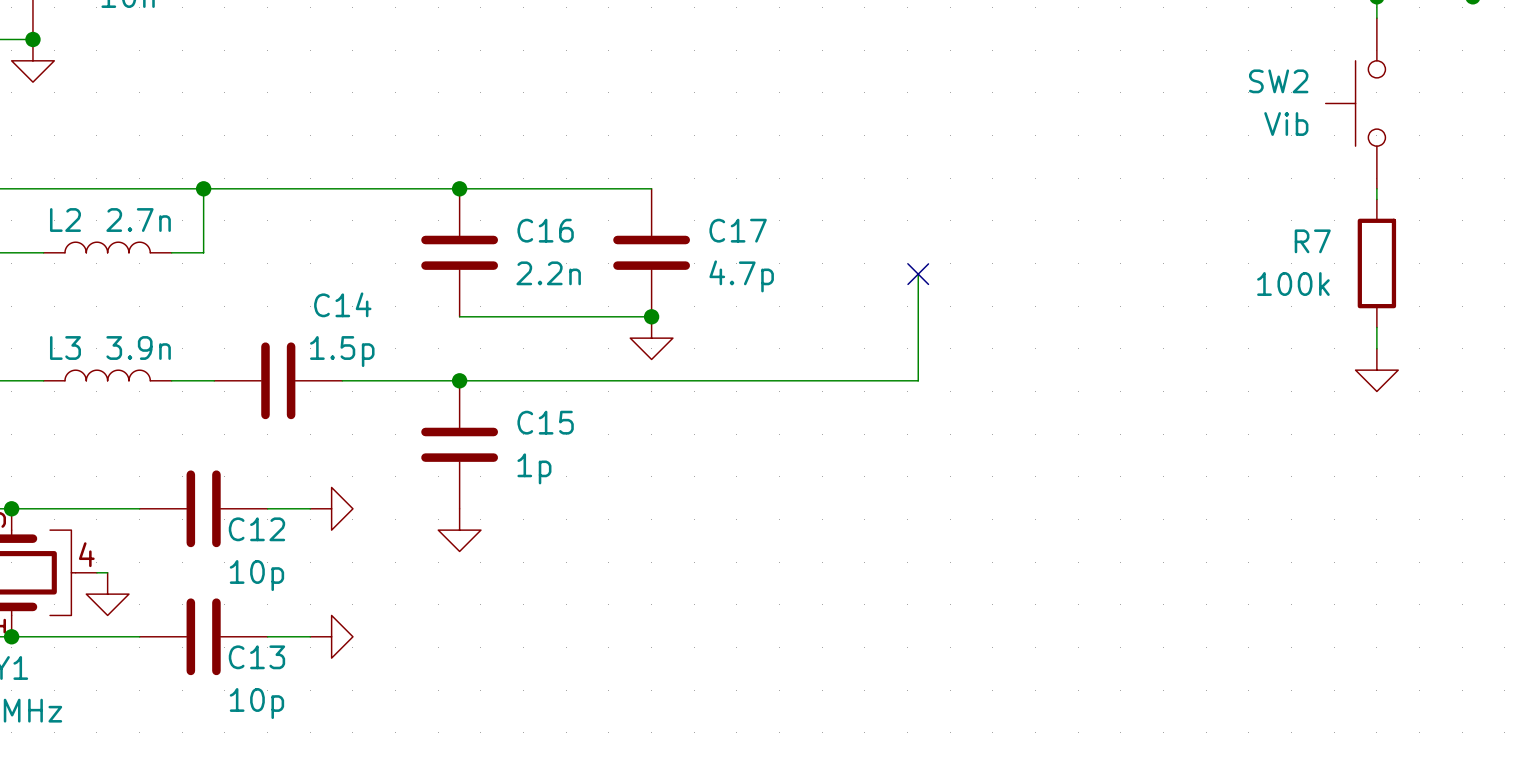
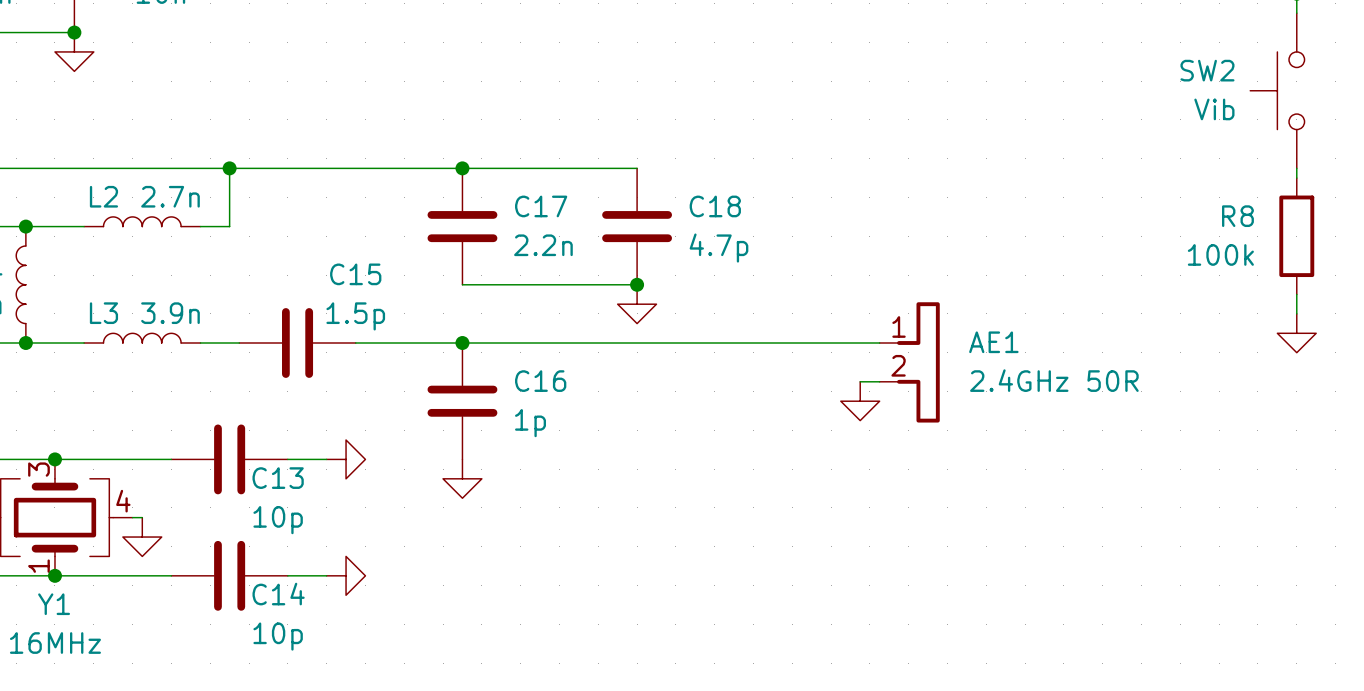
C16 name: C16 (545, 230) -> C17 (541, 206)
C17 name: C17 (738, 230) -> C18 (715, 206)
R7 name: R7 (1312, 241) -> R8 (1237, 216)
wire: (918, 274) (918, 380) -> none
no-connect mark: (918, 274) -> none
C14 name: C14 (342, 304) -> C15 (355, 274)
AE1: none -> 2.4GHz 50R (909, 362)
C15 name: C15 (545, 422) -> C16 (540, 381)
wire: none -> (860, 381) (879, 381)
power symbol: none -> (860, 401)
C12 name: C12 (256, 529) -> C13 (278, 478)
C13 name: C13 (256, 657) -> C14 (278, 594)

